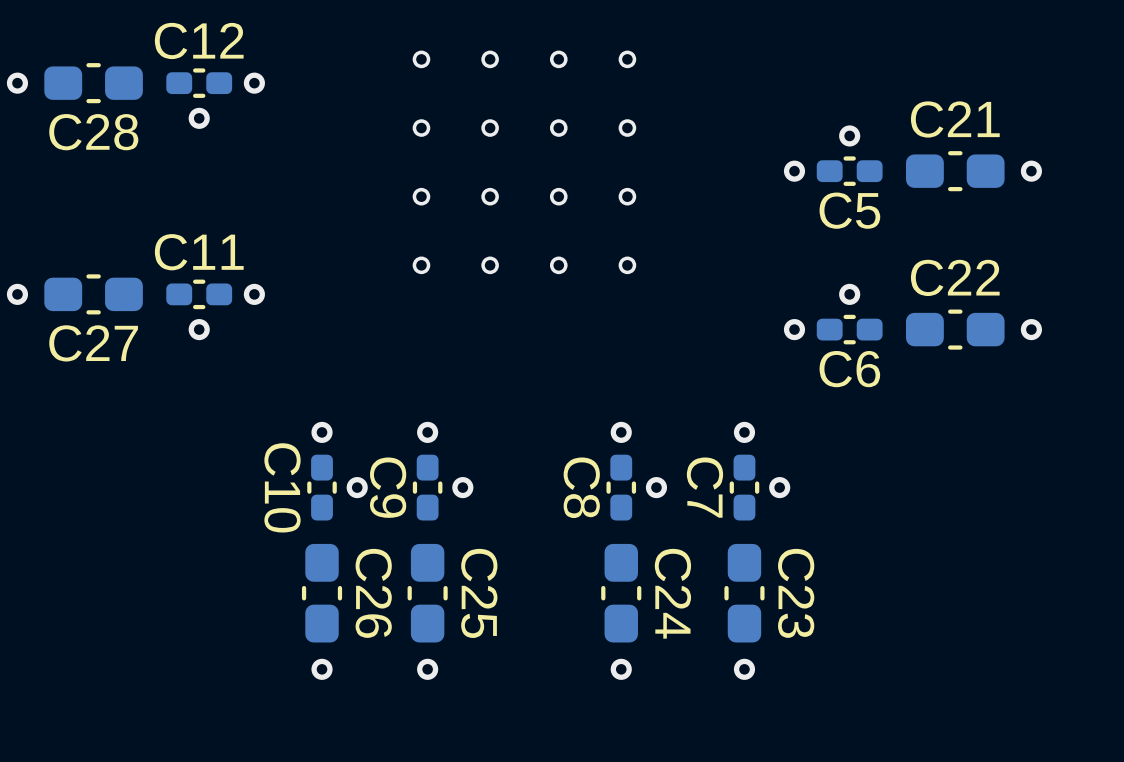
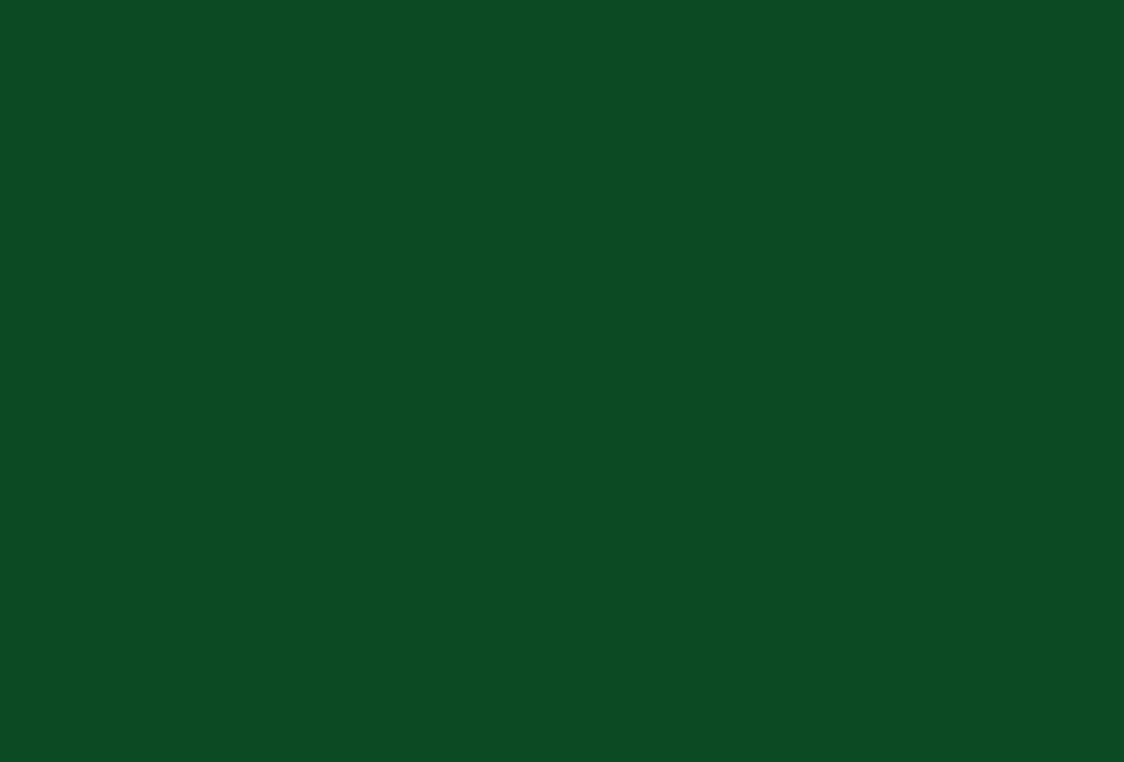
via: (421, 59) -> none
via: (490, 59) -> none
via: (558, 59) -> none
via: (627, 59) -> none
via: (17, 83) -> none
C28: (93, 83) -> none
C12: (199, 83) -> none
via: (254, 83) -> none
via: (199, 118) -> none
via: (421, 128) -> none
via: (490, 128) -> none
via: (558, 128) -> none
via: (627, 128) -> none
via: (849, 135) -> none
via: (794, 171) -> none
C5: (849, 171) -> none
C21: (955, 171) -> none
via: (1031, 171) -> none
via: (421, 196) -> none
via: (490, 196) -> none
via: (558, 196) -> none
via: (627, 196) -> none
via: (421, 265) -> none
via: (490, 265) -> none
via: (558, 265) -> none
via: (627, 265) -> none
via: (17, 294) -> none
C27: (93, 294) -> none
C11: (199, 294) -> none
via: (254, 294) -> none
via: (849, 294) -> none
via: (199, 329) -> none
via: (794, 329) -> none
C6: (849, 329) -> none
C22: (955, 329) -> none
via: (1031, 329) -> none
via: (322, 432) -> none
via: (427, 432) -> none
via: (621, 432) -> none
via: (744, 432) -> none
C10: (322, 487) -> none
via: (357, 487) -> none
C9: (427, 487) -> none
via: (462, 487) -> none
C8: (621, 487) -> none
via: (656, 487) -> none
C7: (744, 487) -> none
via: (779, 487) -> none
C26: (322, 593) -> none
C25: (427, 593) -> none
C24: (621, 593) -> none
C23: (744, 593) -> none
via: (322, 669) -> none
via: (427, 669) -> none
via: (621, 669) -> none
via: (744, 669) -> none

